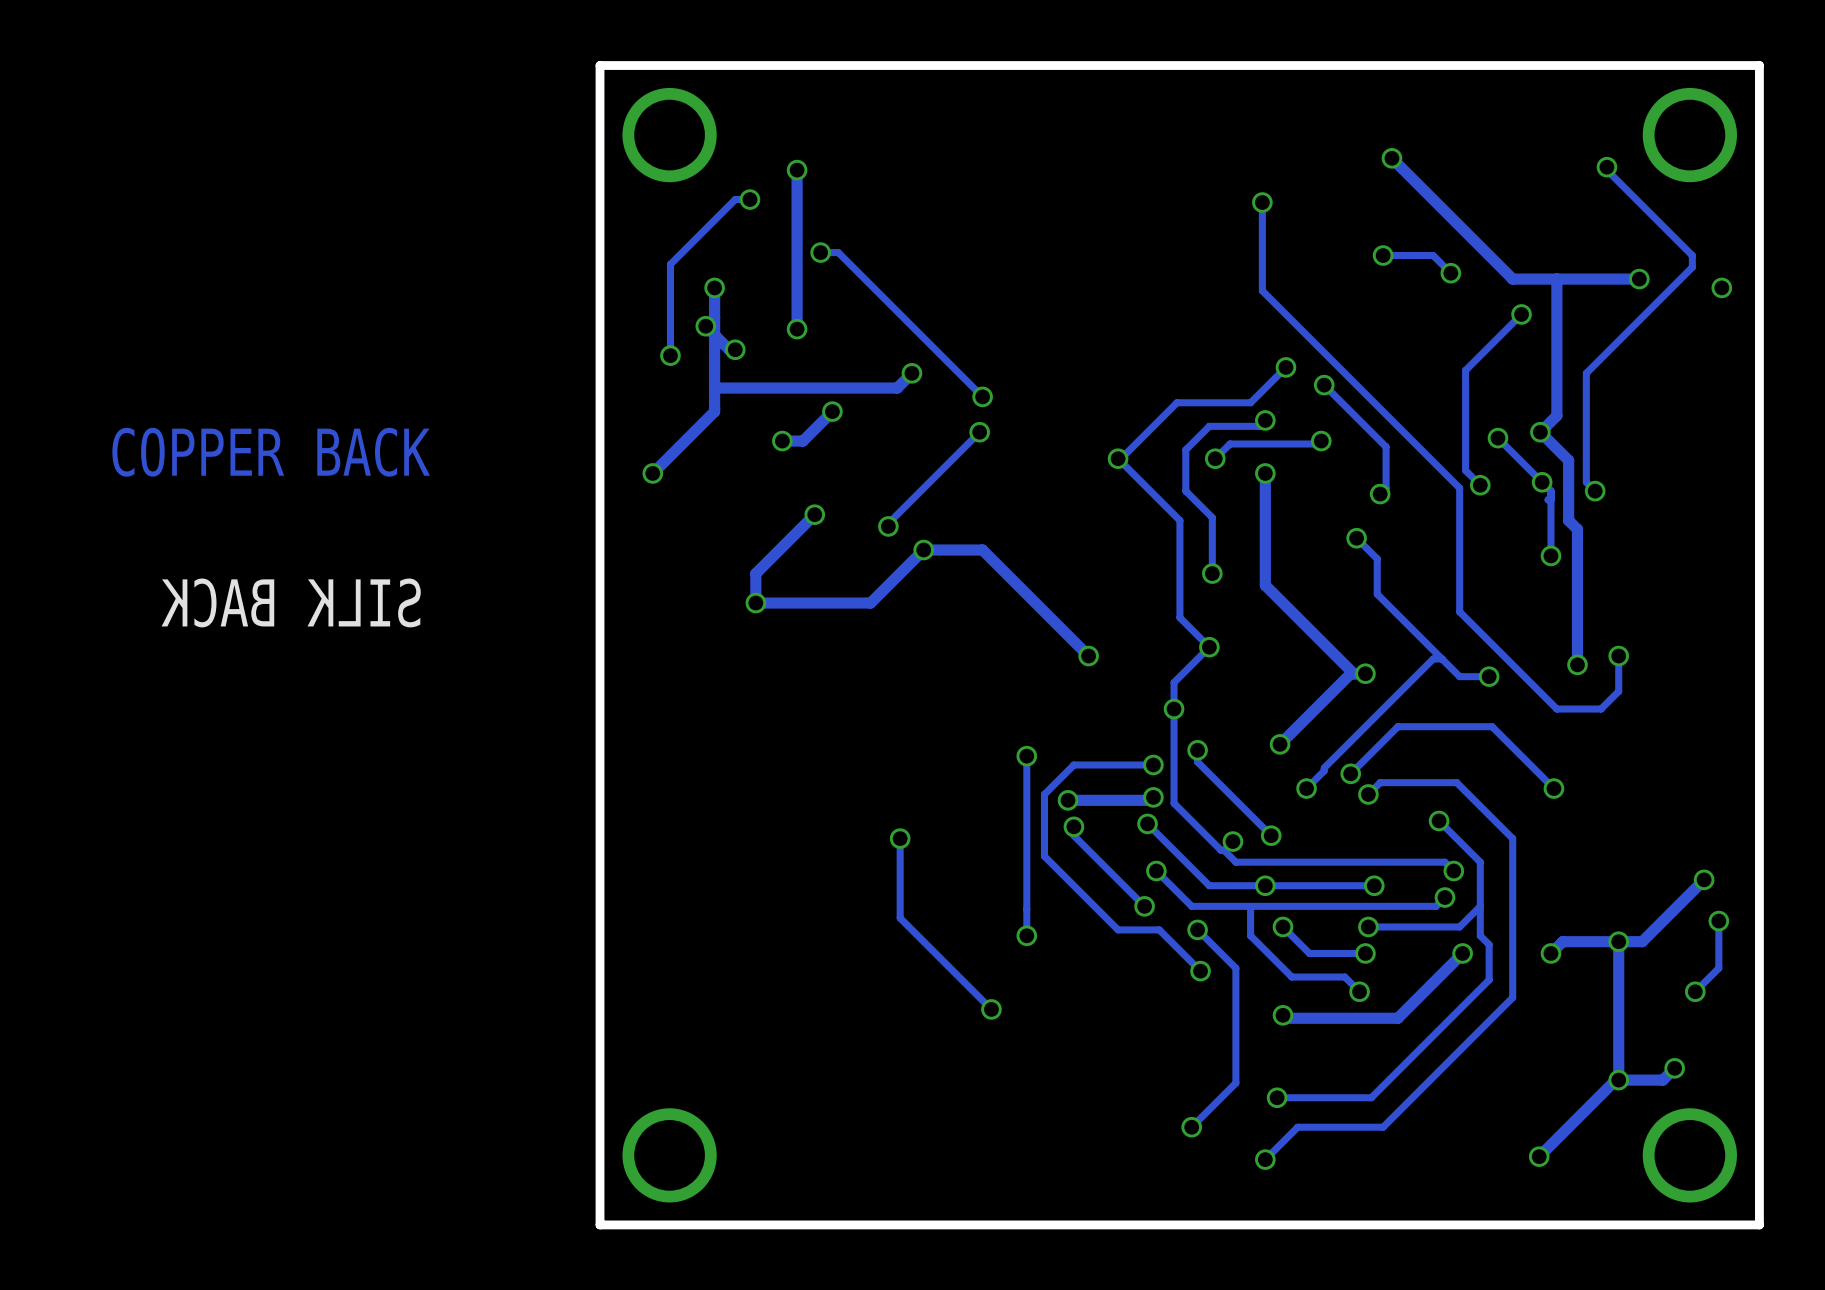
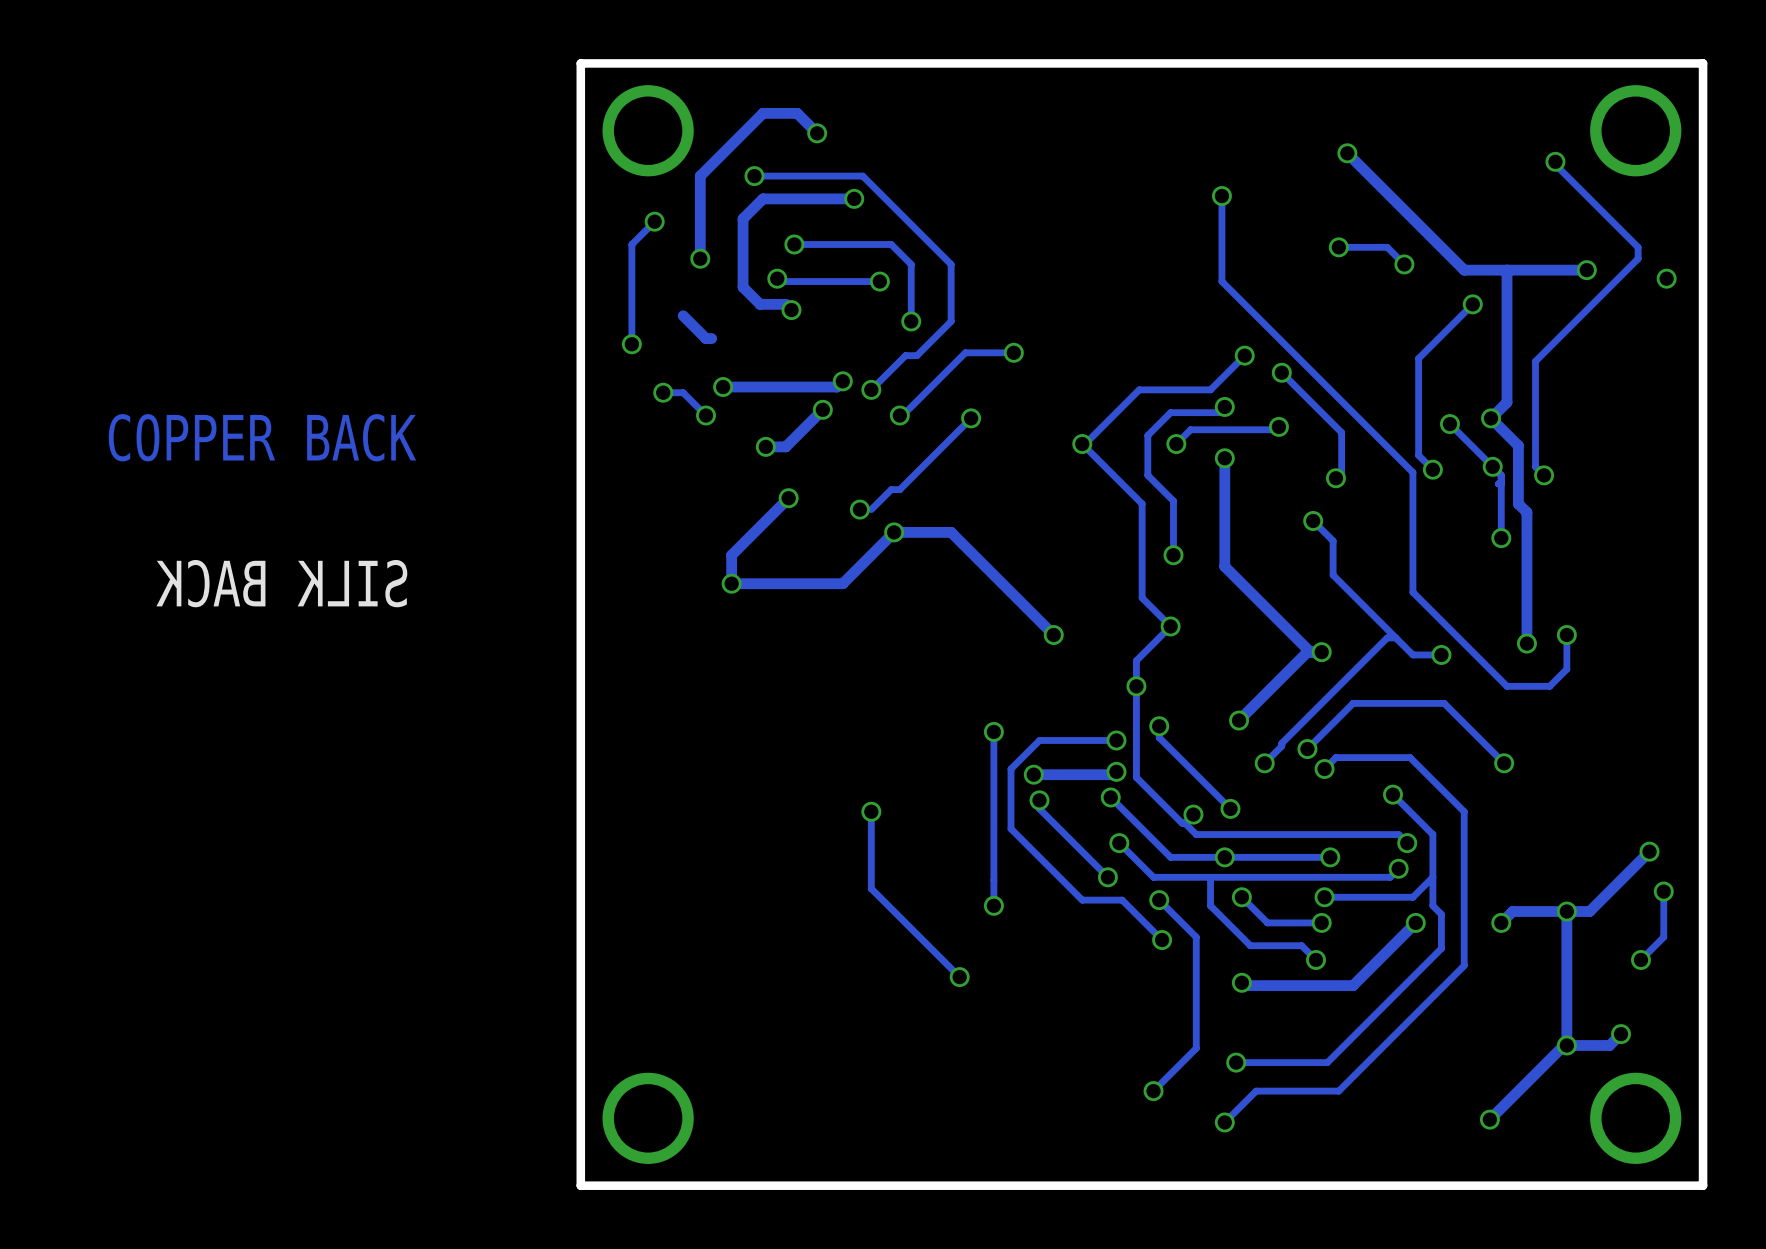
track: none -> (817, 133) (797, 113) (763, 113) (700, 176) (700, 258)
via: none -> (817, 133)
track: (797, 170) (797, 329) -> none
via position: (797, 170) -> (754, 176)
track: none -> (754, 176) (862, 176) (951, 264) (951, 321) (916, 355) (905, 355) (871, 389)
track: (749, 199) (735, 199) (670, 264) (670, 355) -> none
via: (749, 199) -> none
track: none -> (854, 198) (763, 198) (743, 218) (743, 287) (760, 304) (785, 304) (791, 310)
via: none -> (854, 198)
track: none -> (654, 221) (631, 244) (631, 344)
via: none -> (654, 221)
track: (838, 252) (982, 396) -> (811, 244) (891, 244) (911, 264) (911, 321)
track: (714, 287) (714, 411) (652, 473) -> none
via position: (714, 287) -> (700, 258)
track: none -> (777, 278) (780, 281) (879, 281)
via: none -> (777, 278)
via: none -> (879, 281)
via: (705, 326) -> none
via position: (797, 329) -> (791, 310)
via: none -> (911, 321)
via: (735, 349) -> none
via position: (670, 355) -> (631, 344)
track: none -> (1013, 352) (965, 352) (902, 415) (899, 415)
via: none -> (1013, 352)
track: (911, 373) (897, 388) (714, 388) -> none
via: (911, 373) -> none
track: none -> (842, 381) (837, 387) (723, 387)
via: none -> (842, 381)
via: (982, 396) -> none
via: none -> (723, 387)
via: none -> (871, 389)
track: none -> (663, 392) (683, 392) (705, 415)
via: none -> (663, 392)
track: (832, 411) (802, 441) (782, 441) -> none
via position: (832, 411) -> (822, 409)
track: none -> (822, 409) (785, 446) (765, 446)
via: none -> (705, 415)
via: none -> (899, 415)
track: (979, 432) (888, 523) (888, 526) -> none
via: (979, 432) -> none
track: none -> (971, 418) (899, 489) (891, 489) (871, 509)
via: none -> (971, 418)
via position: (782, 441) -> (765, 446)
via: (652, 473) -> none

